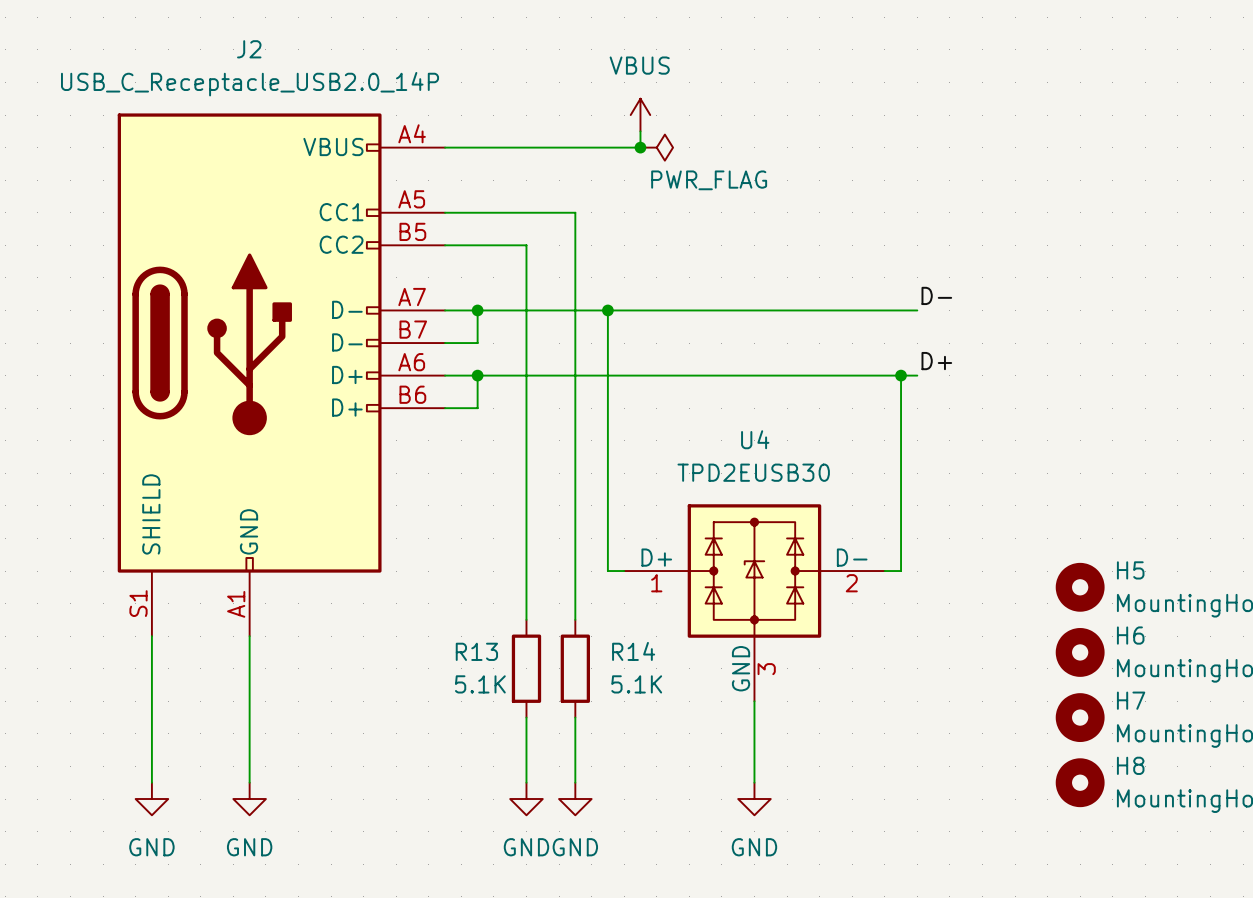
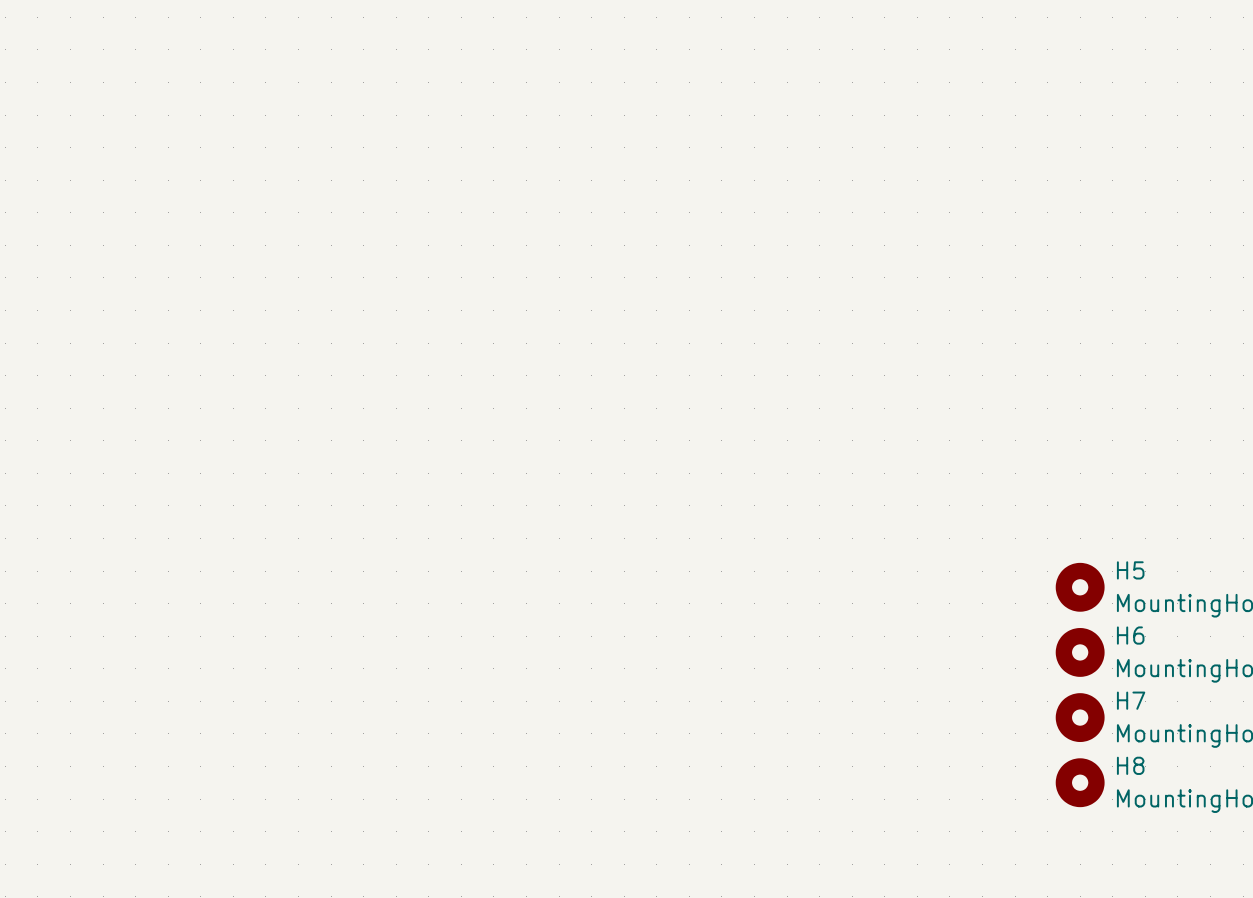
power symbol: VBUS (640, 115) -> none
wire: (640, 131) (640, 147) (445, 147) -> none
junction: (640, 147) -> none
power symbol: PWR_FLAG (656, 147) -> none
wire: (445, 212) (575, 212) (575, 619) -> none
wire: (445, 245) (526, 245) (526, 619) -> none
label: D- (936, 295) -> none
wire: (445, 310) (917, 310) -> none
wire: (477, 310) (477, 343) (445, 343) -> none
junction: (477, 310) -> none
wire: (607, 310) (607, 571) (624, 571) -> none
junction: (607, 310) -> none
label: D+ (936, 361) -> none
J2: USB_C_Receptacle_USB2.0_14P (281, 374) -> none
wire: (445, 375) (917, 375) -> none
wire: (477, 375) (477, 408) (445, 408) -> none
junction: (477, 375) -> none
wire: (901, 375) (901, 571) (884, 571) -> none
junction: (901, 375) -> none
U4: TPD2EUSB30 (754, 602) -> none
wire: (151, 636) (151, 782) -> none
wire: (249, 636) (249, 782) -> none
R13: 5.1K (526, 668) -> none
R14: 5.1K (575, 668) -> none
wire: (754, 701) (754, 782) -> none
wire: (526, 717) (526, 782) -> none
wire: (575, 717) (575, 782) -> none
power symbol: GND (151, 799) -> none
power symbol: GND (249, 799) -> none
power symbol: GND (526, 799) -> none
power symbol: GND (575, 799) -> none
power symbol: GND (754, 799) -> none

